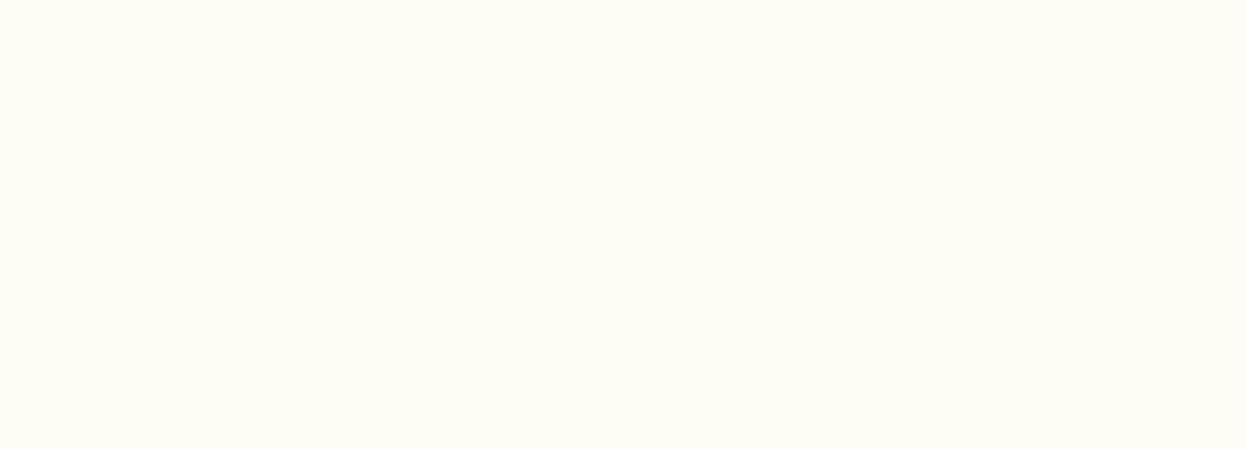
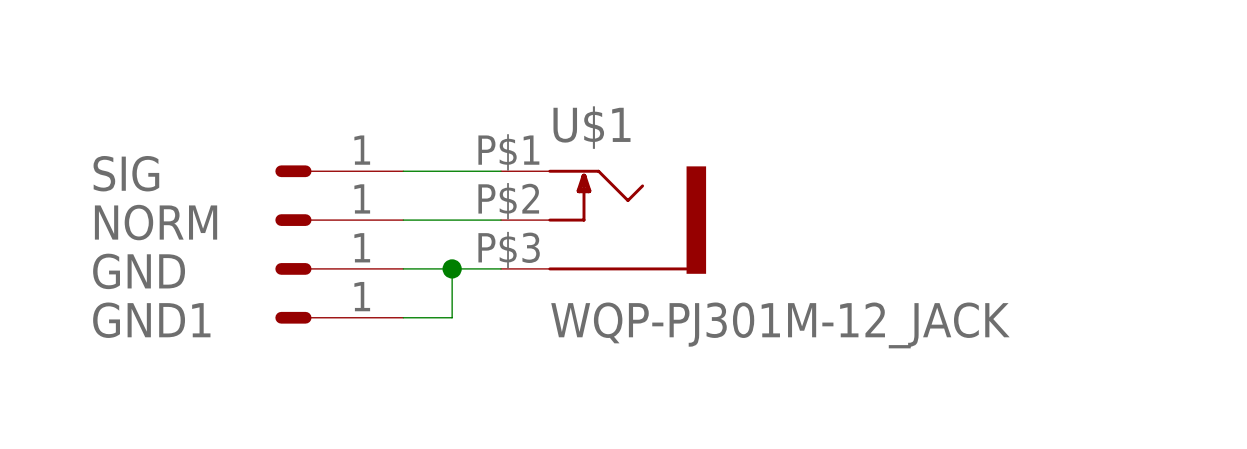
SIG: none -> (339, 171)
wire: none -> (403, 171) (500, 171)
NORM: none -> (339, 220)
wire: none -> (403, 220) (500, 220)
U$1: none -> WQP-PJ301M-12_JACK (603, 220)
GND: none -> (339, 268)
wire: none -> (403, 268) (500, 268)
wire: none -> (452, 268) (452, 317) (403, 317)
junction: none -> (452, 268)
GND1: none -> (339, 317)

